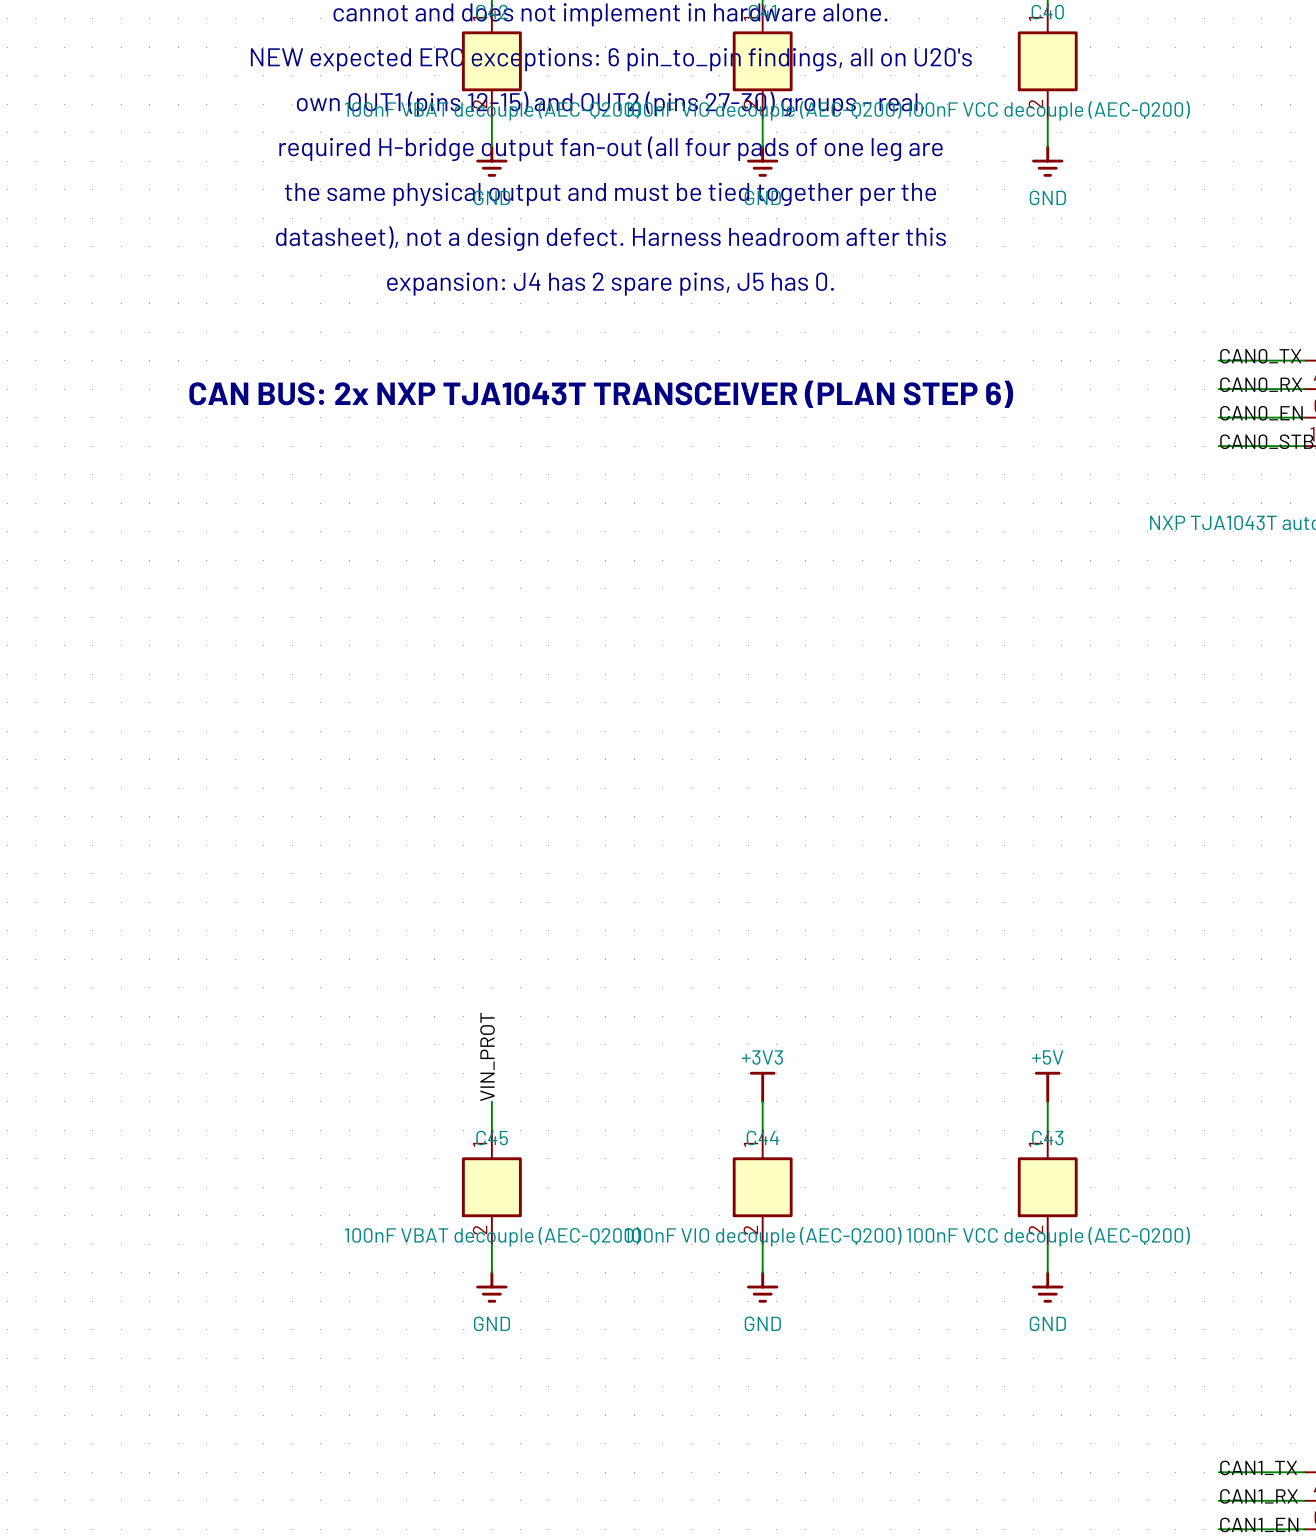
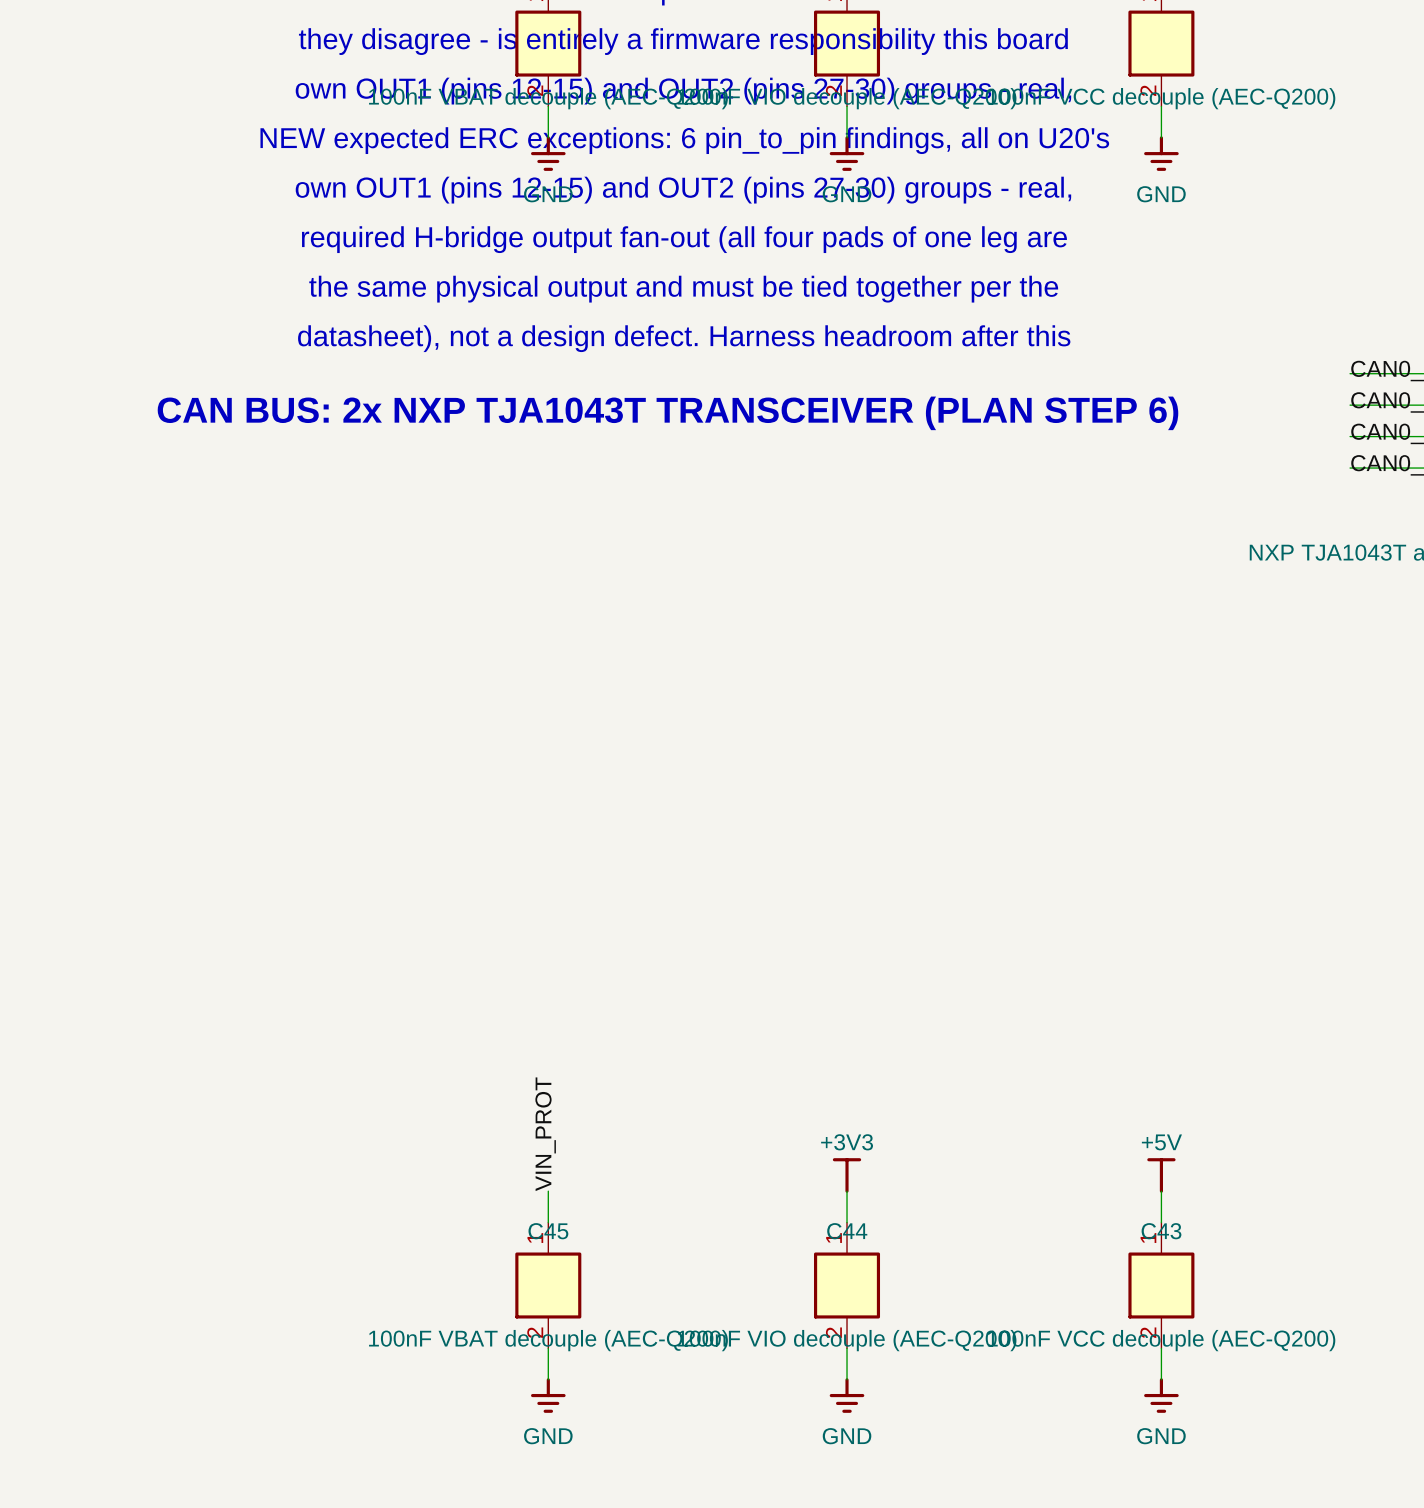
text: NEW expected ERC exceptions: 6 pin_to_pin findings, all on U20's (611, 59) -> they disagree - is entirely a firmware responsibility this board (683, 41)
text: required H-bridge output fan-out (all four pads of one leg are (611, 148) -> NEW expected ERC exceptions: 6 pin_to_pin findings, all on U20's (684, 140)
text: the same physical output and must be tied together per the (610, 194) -> own OUT1 (pins 12-15) and OUT2 (pins 27-30) groups - real, (683, 190)
text: datasheet), not a design defect. Harness headroom after this (610, 238) -> required H-bridge output fan-out (all four pads of one leg are (684, 239)
text: expansion: J4 has 2 spare pins, J5 has 0. (610, 284) -> the same physical output and must be tied together per the (683, 289)
text: none -> datasheet), not a design defect. Harness headroom after this (684, 338)

